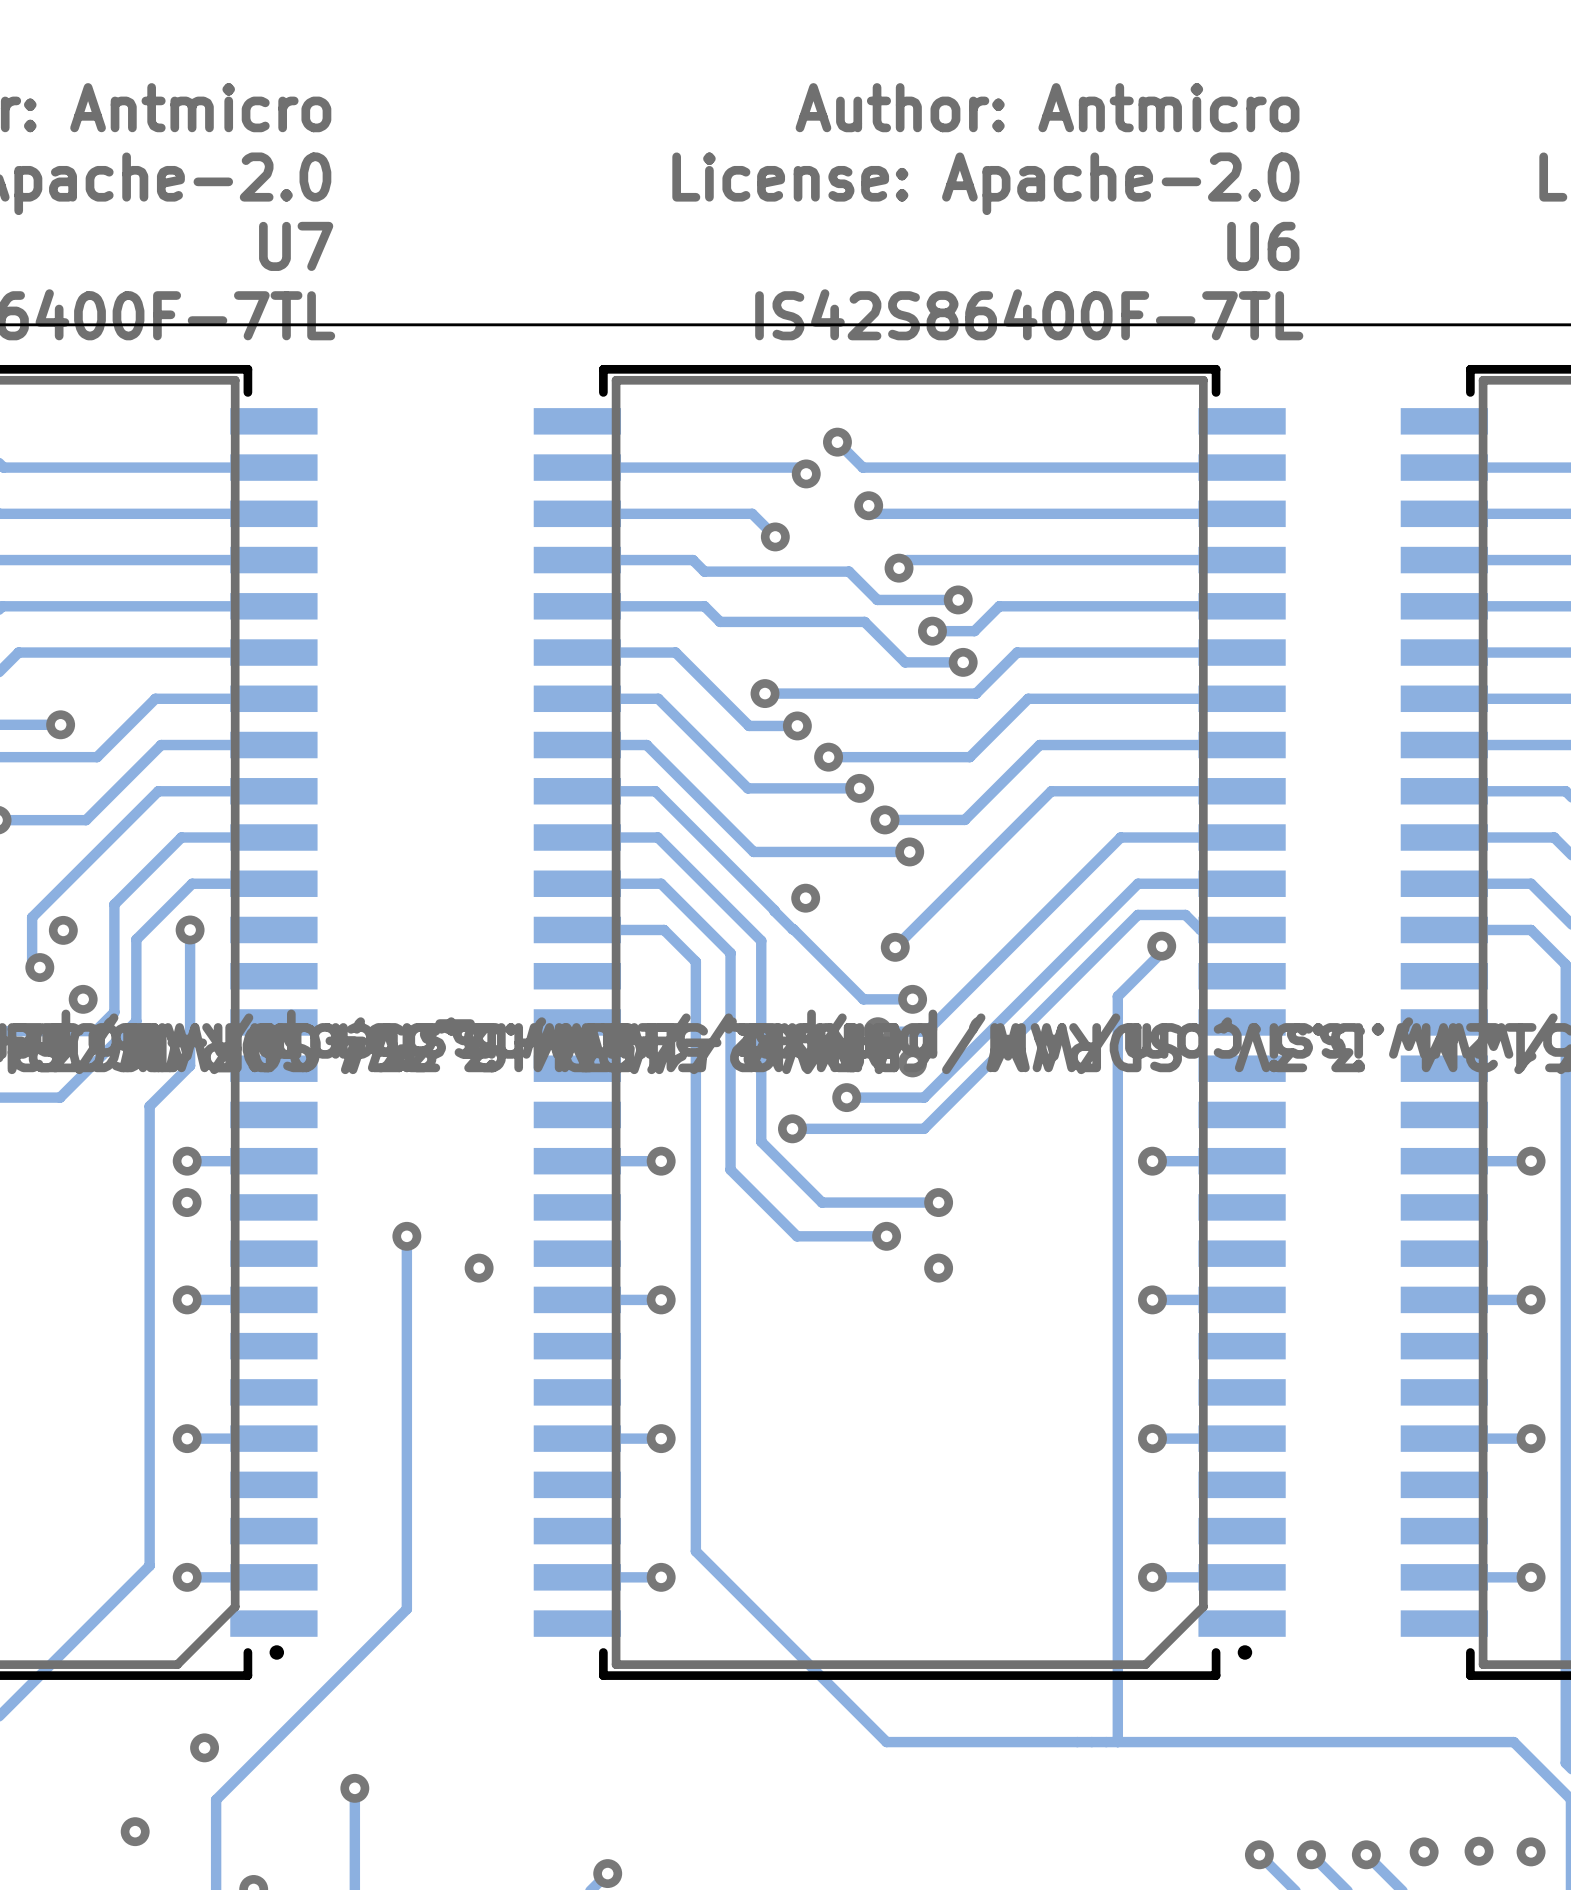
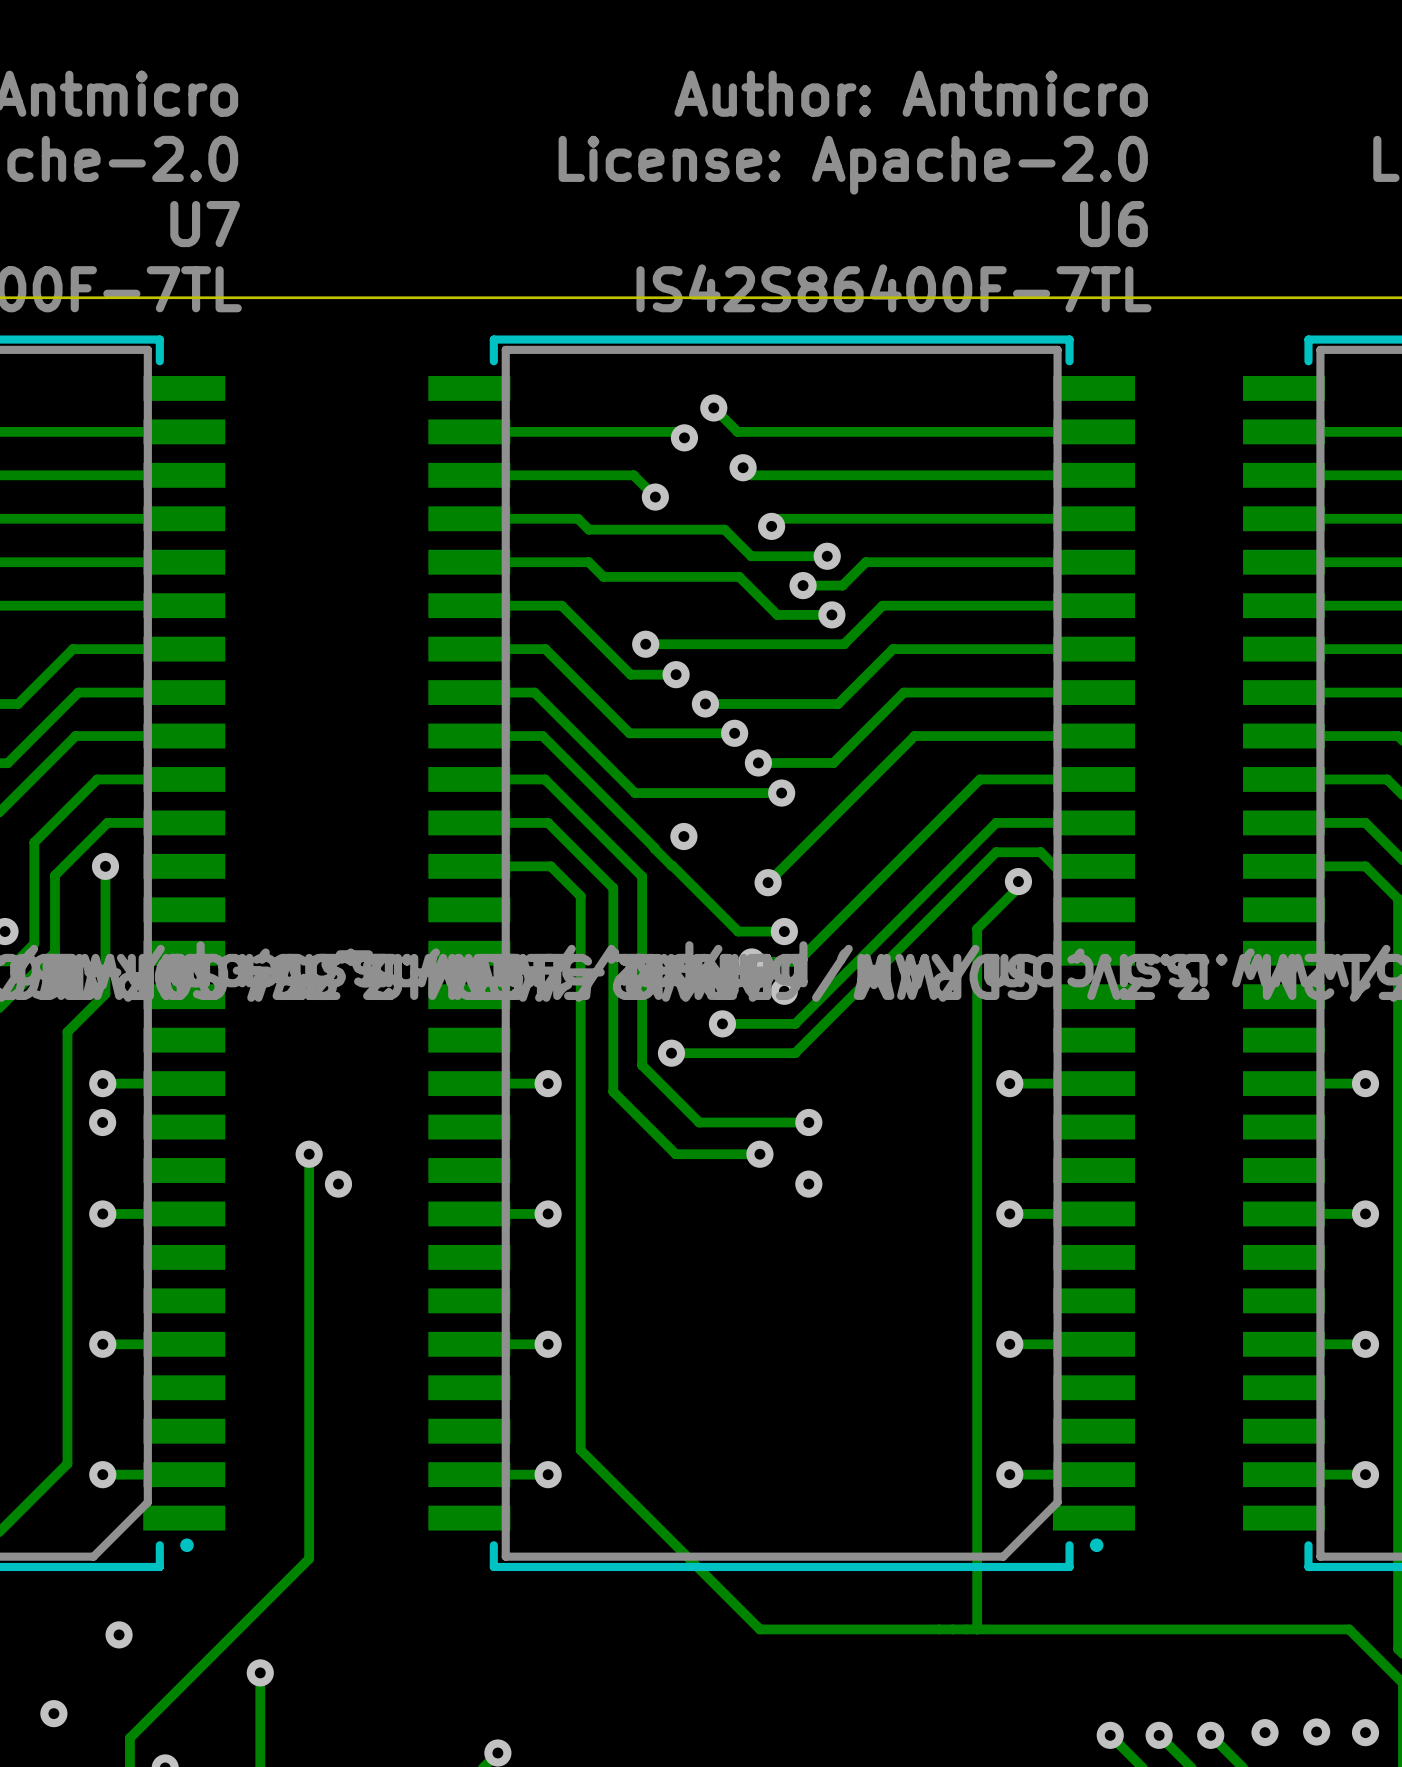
via position: (479, 1268) -> (338, 1184)
track: (406, 1609) (216, 1799) (216, 1857) -> (309, 1504) (309, 1558) (129, 1738)

